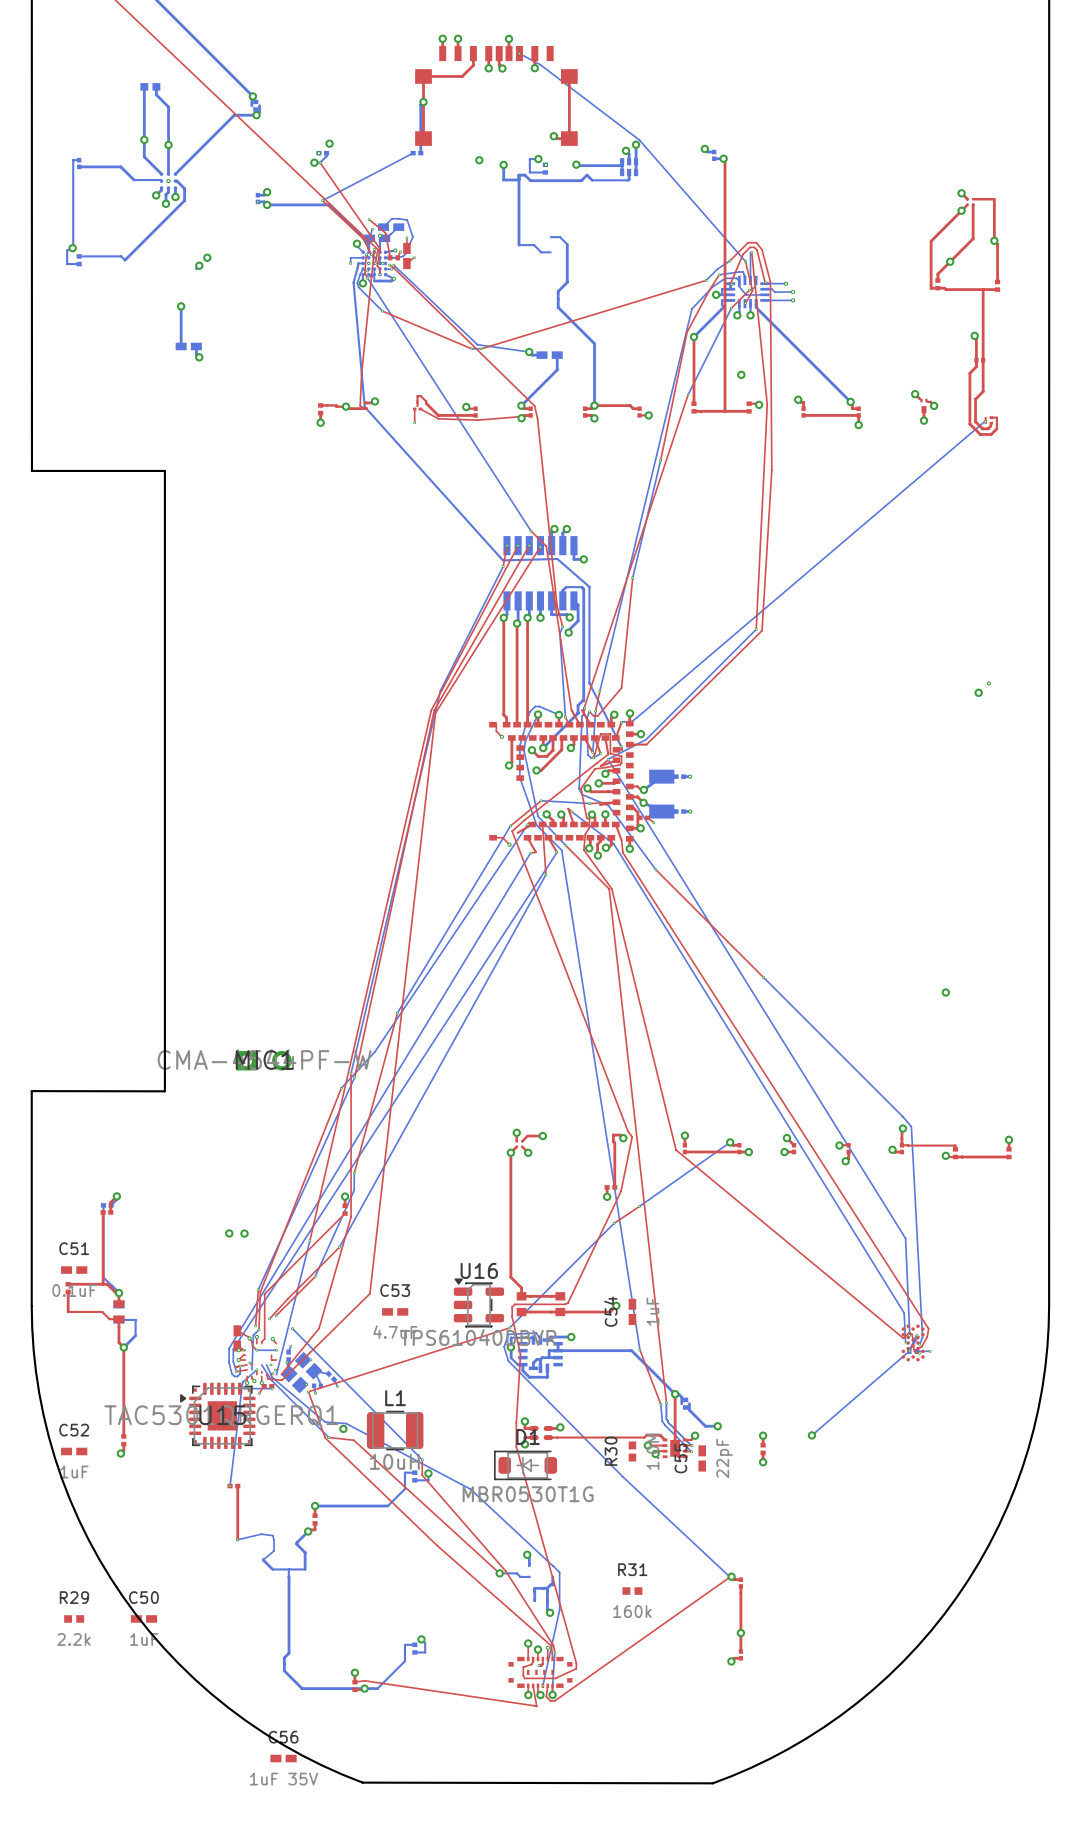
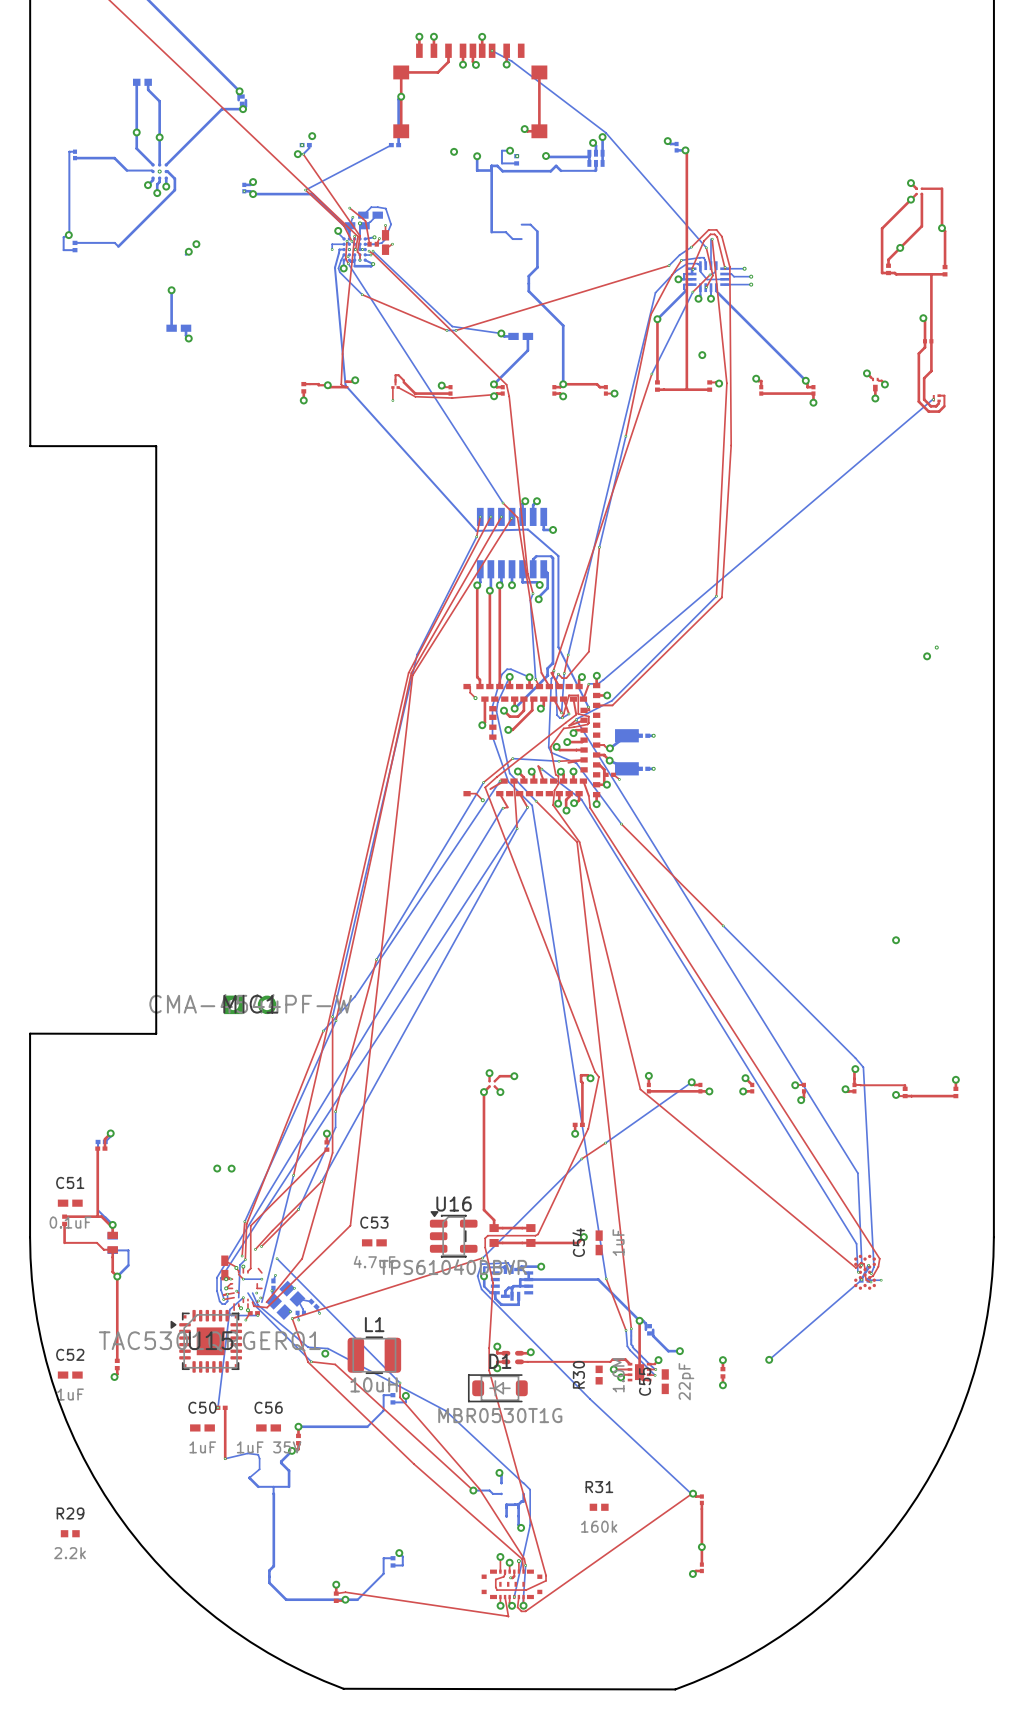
via: (272, 1339) -> none
via: (247, 1383) -> none
C50 position: (143, 1618) -> (202, 1427)
C56 position: (283, 1758) -> (268, 1427)

